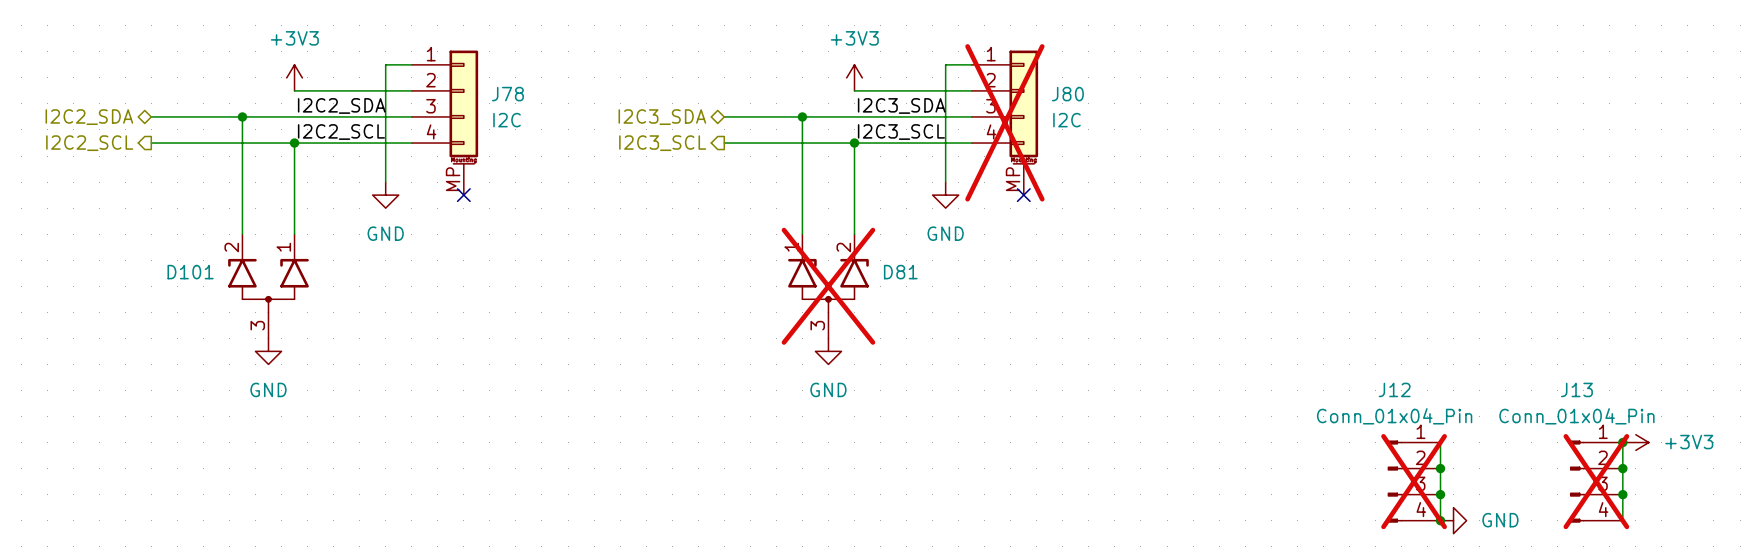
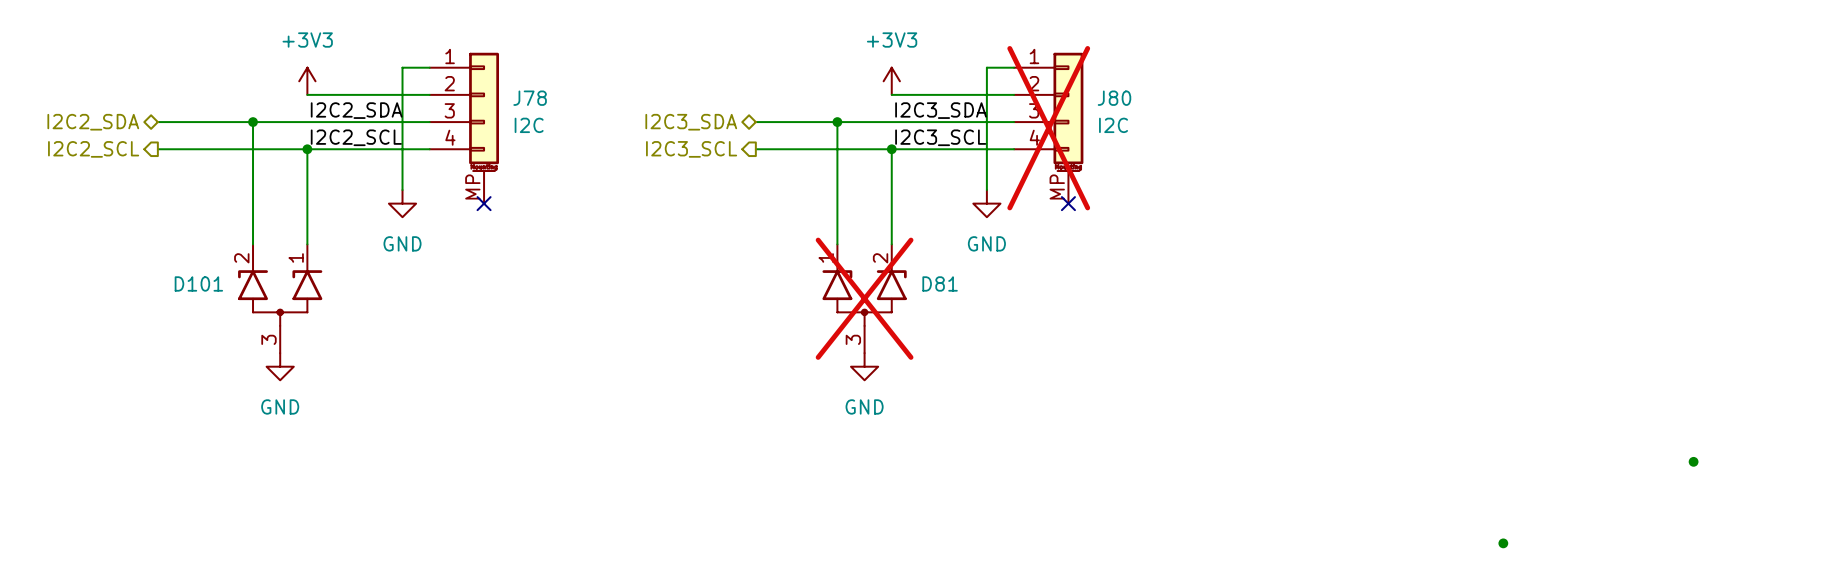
wire: (1440, 442) (1440, 520) -> none
wire: (1622, 442) (1622, 520) -> none
power symbol: +3V3 (1635, 442) -> none
junction: (1440, 468) -> none
junction: (1622, 468) -> none
J12: Conn_01x04_Pin (1414, 481) -> none
J13: Conn_01x04_Pin (1596, 481) -> none
junction: (1440, 494) -> none
junction: (1622, 494) -> none
power symbol: GND (1453, 520) -> none

